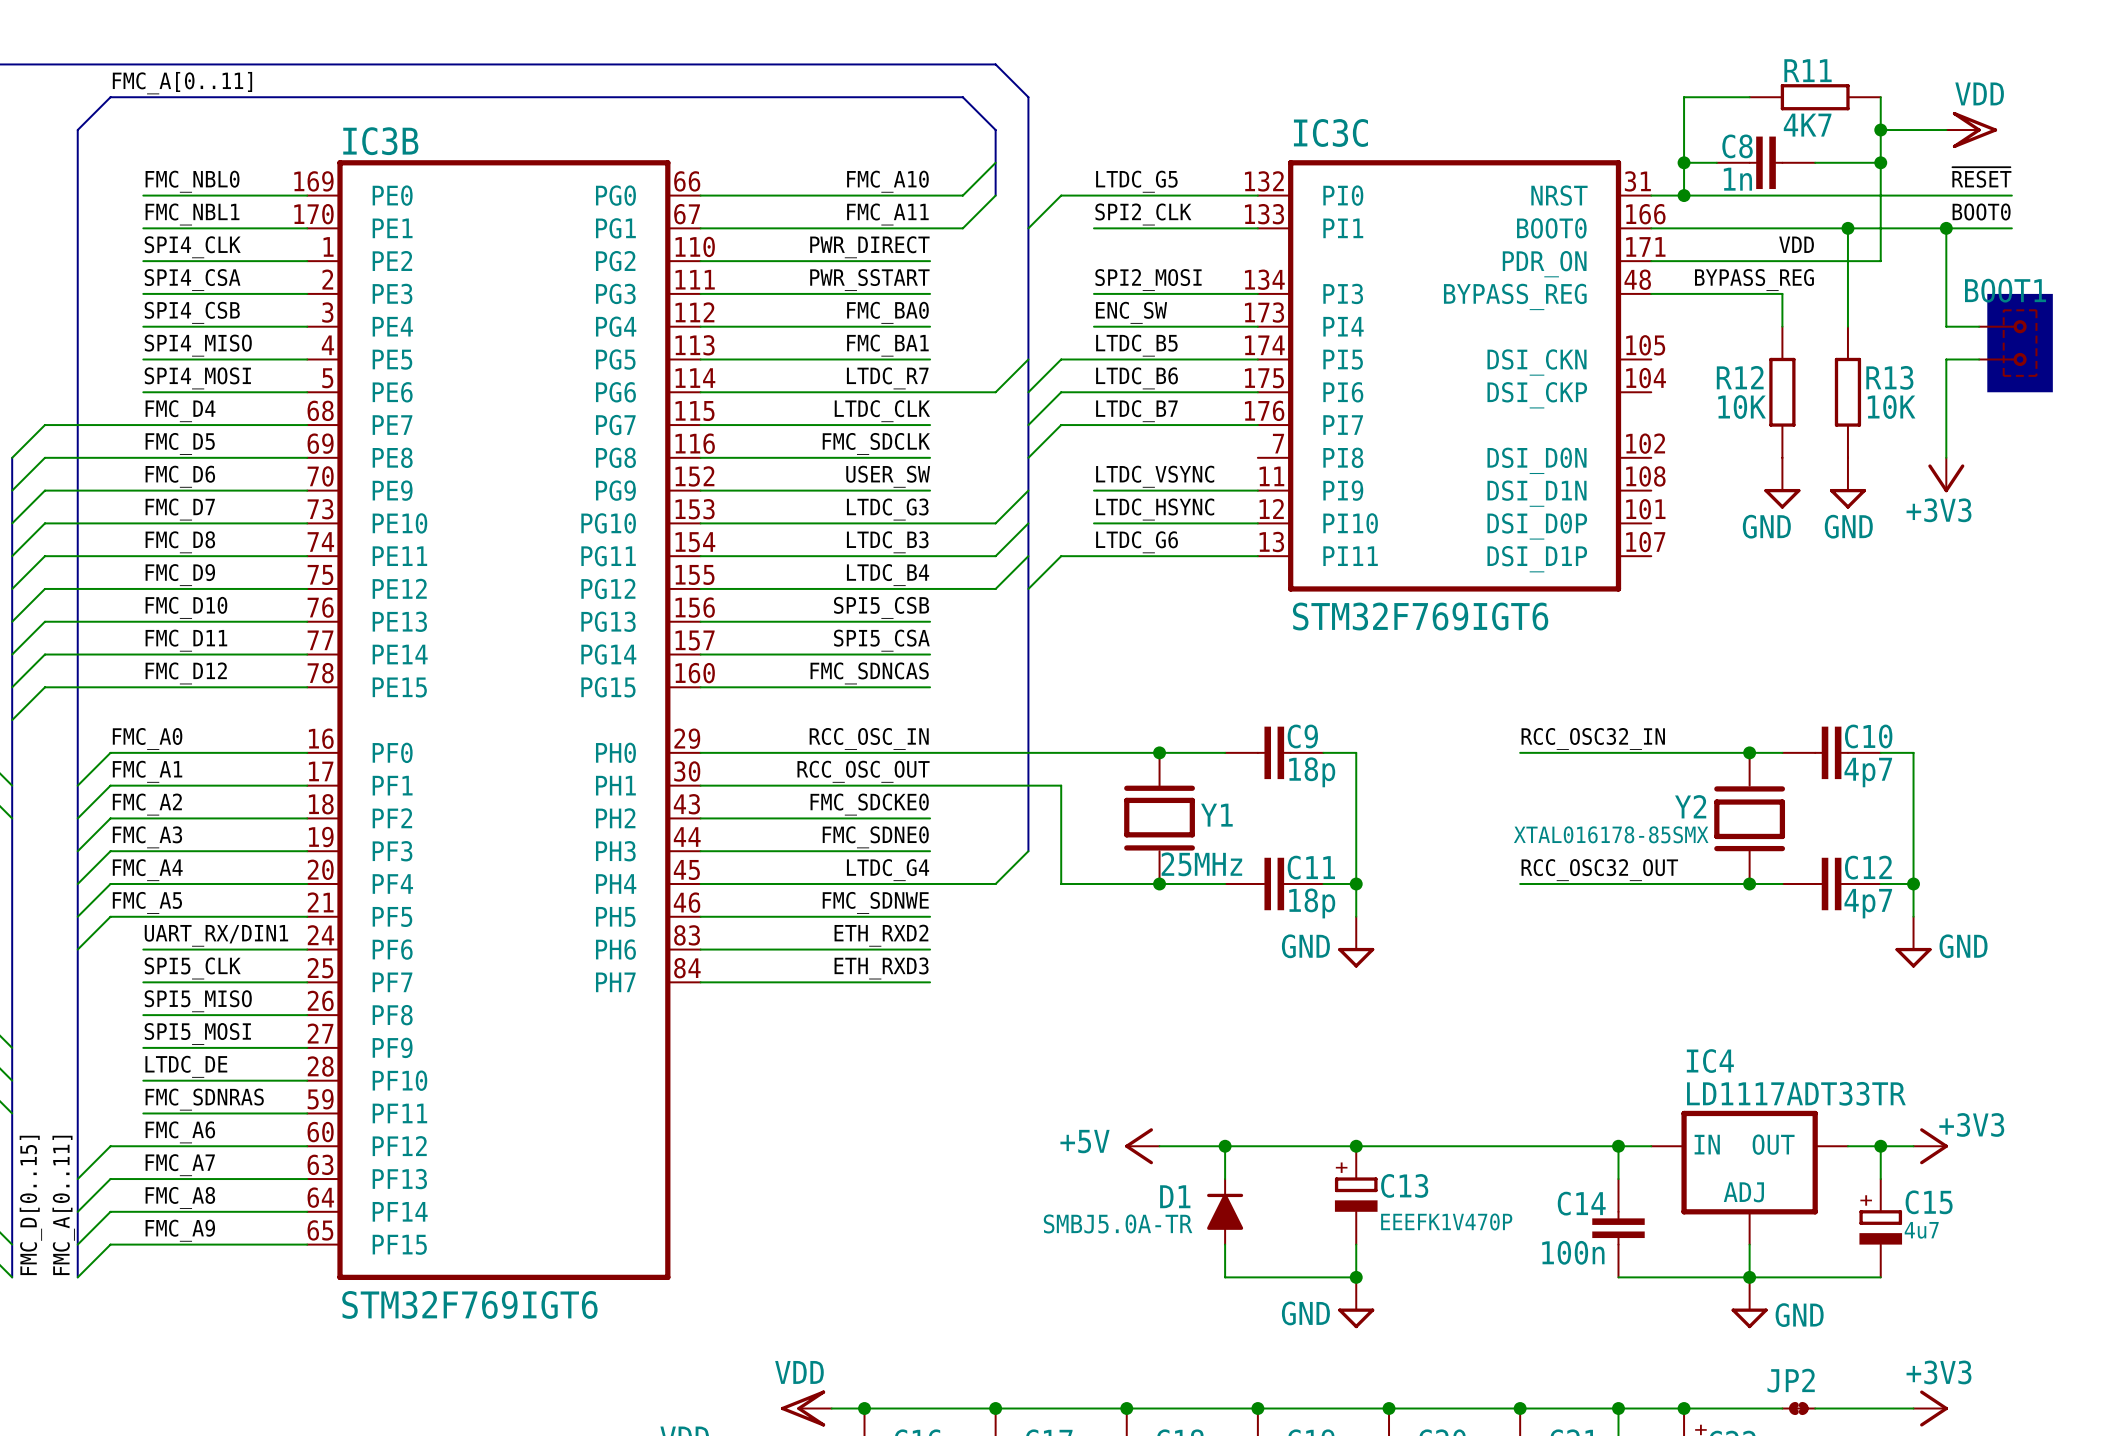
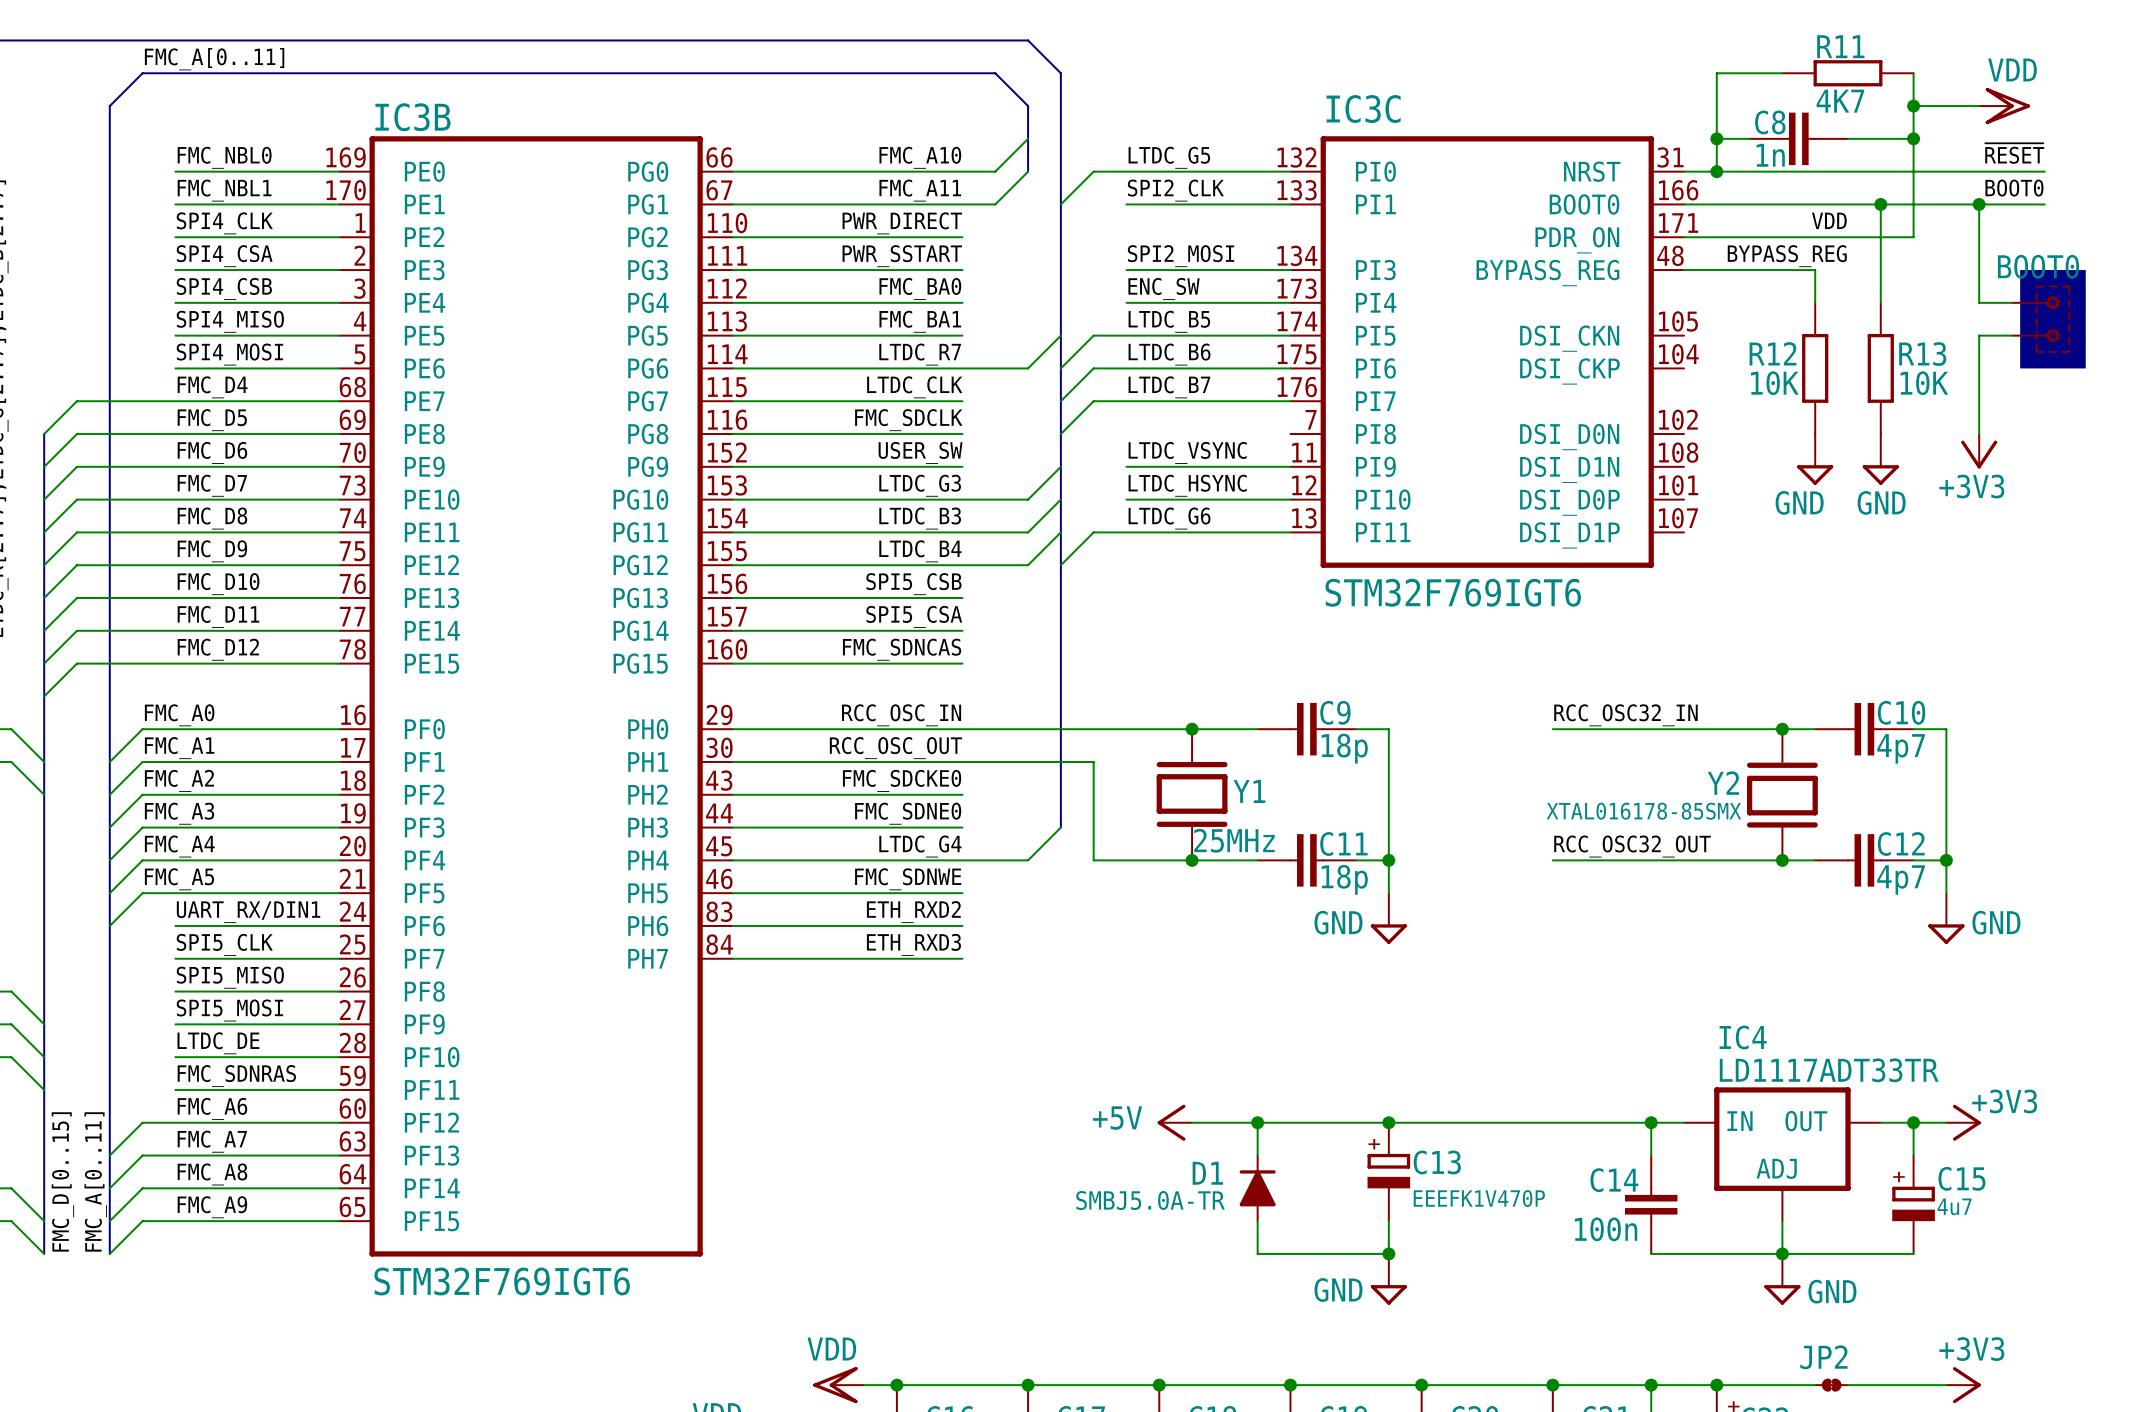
BOOT1 name: BOOT1 (2005, 290) -> BOOT0 (2038, 266)

